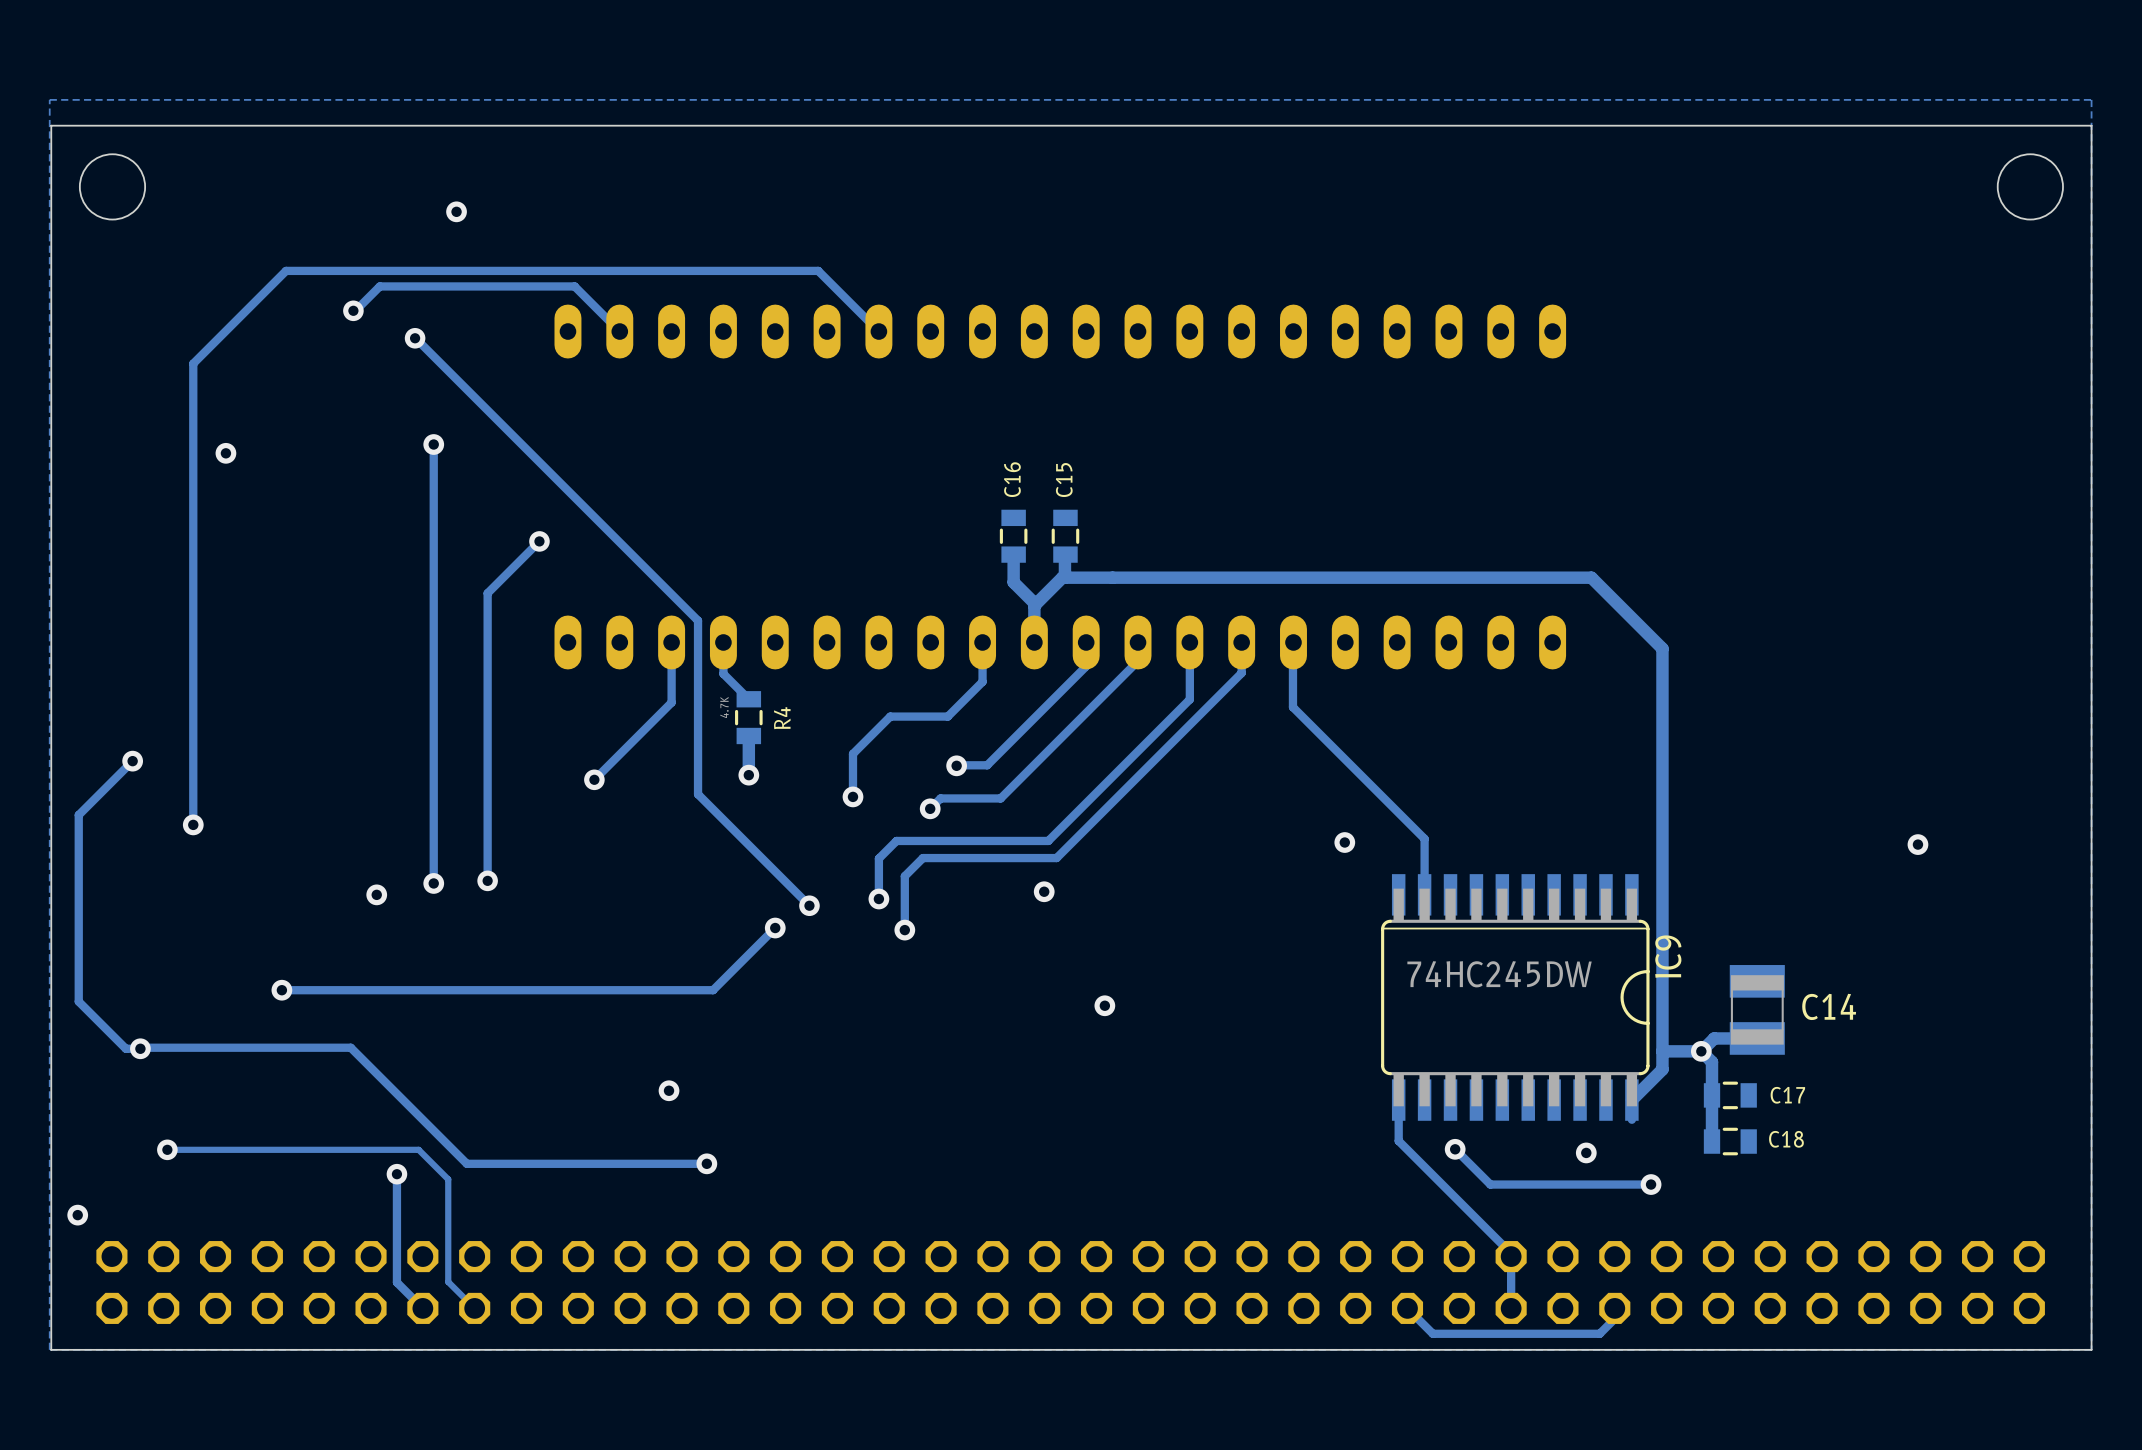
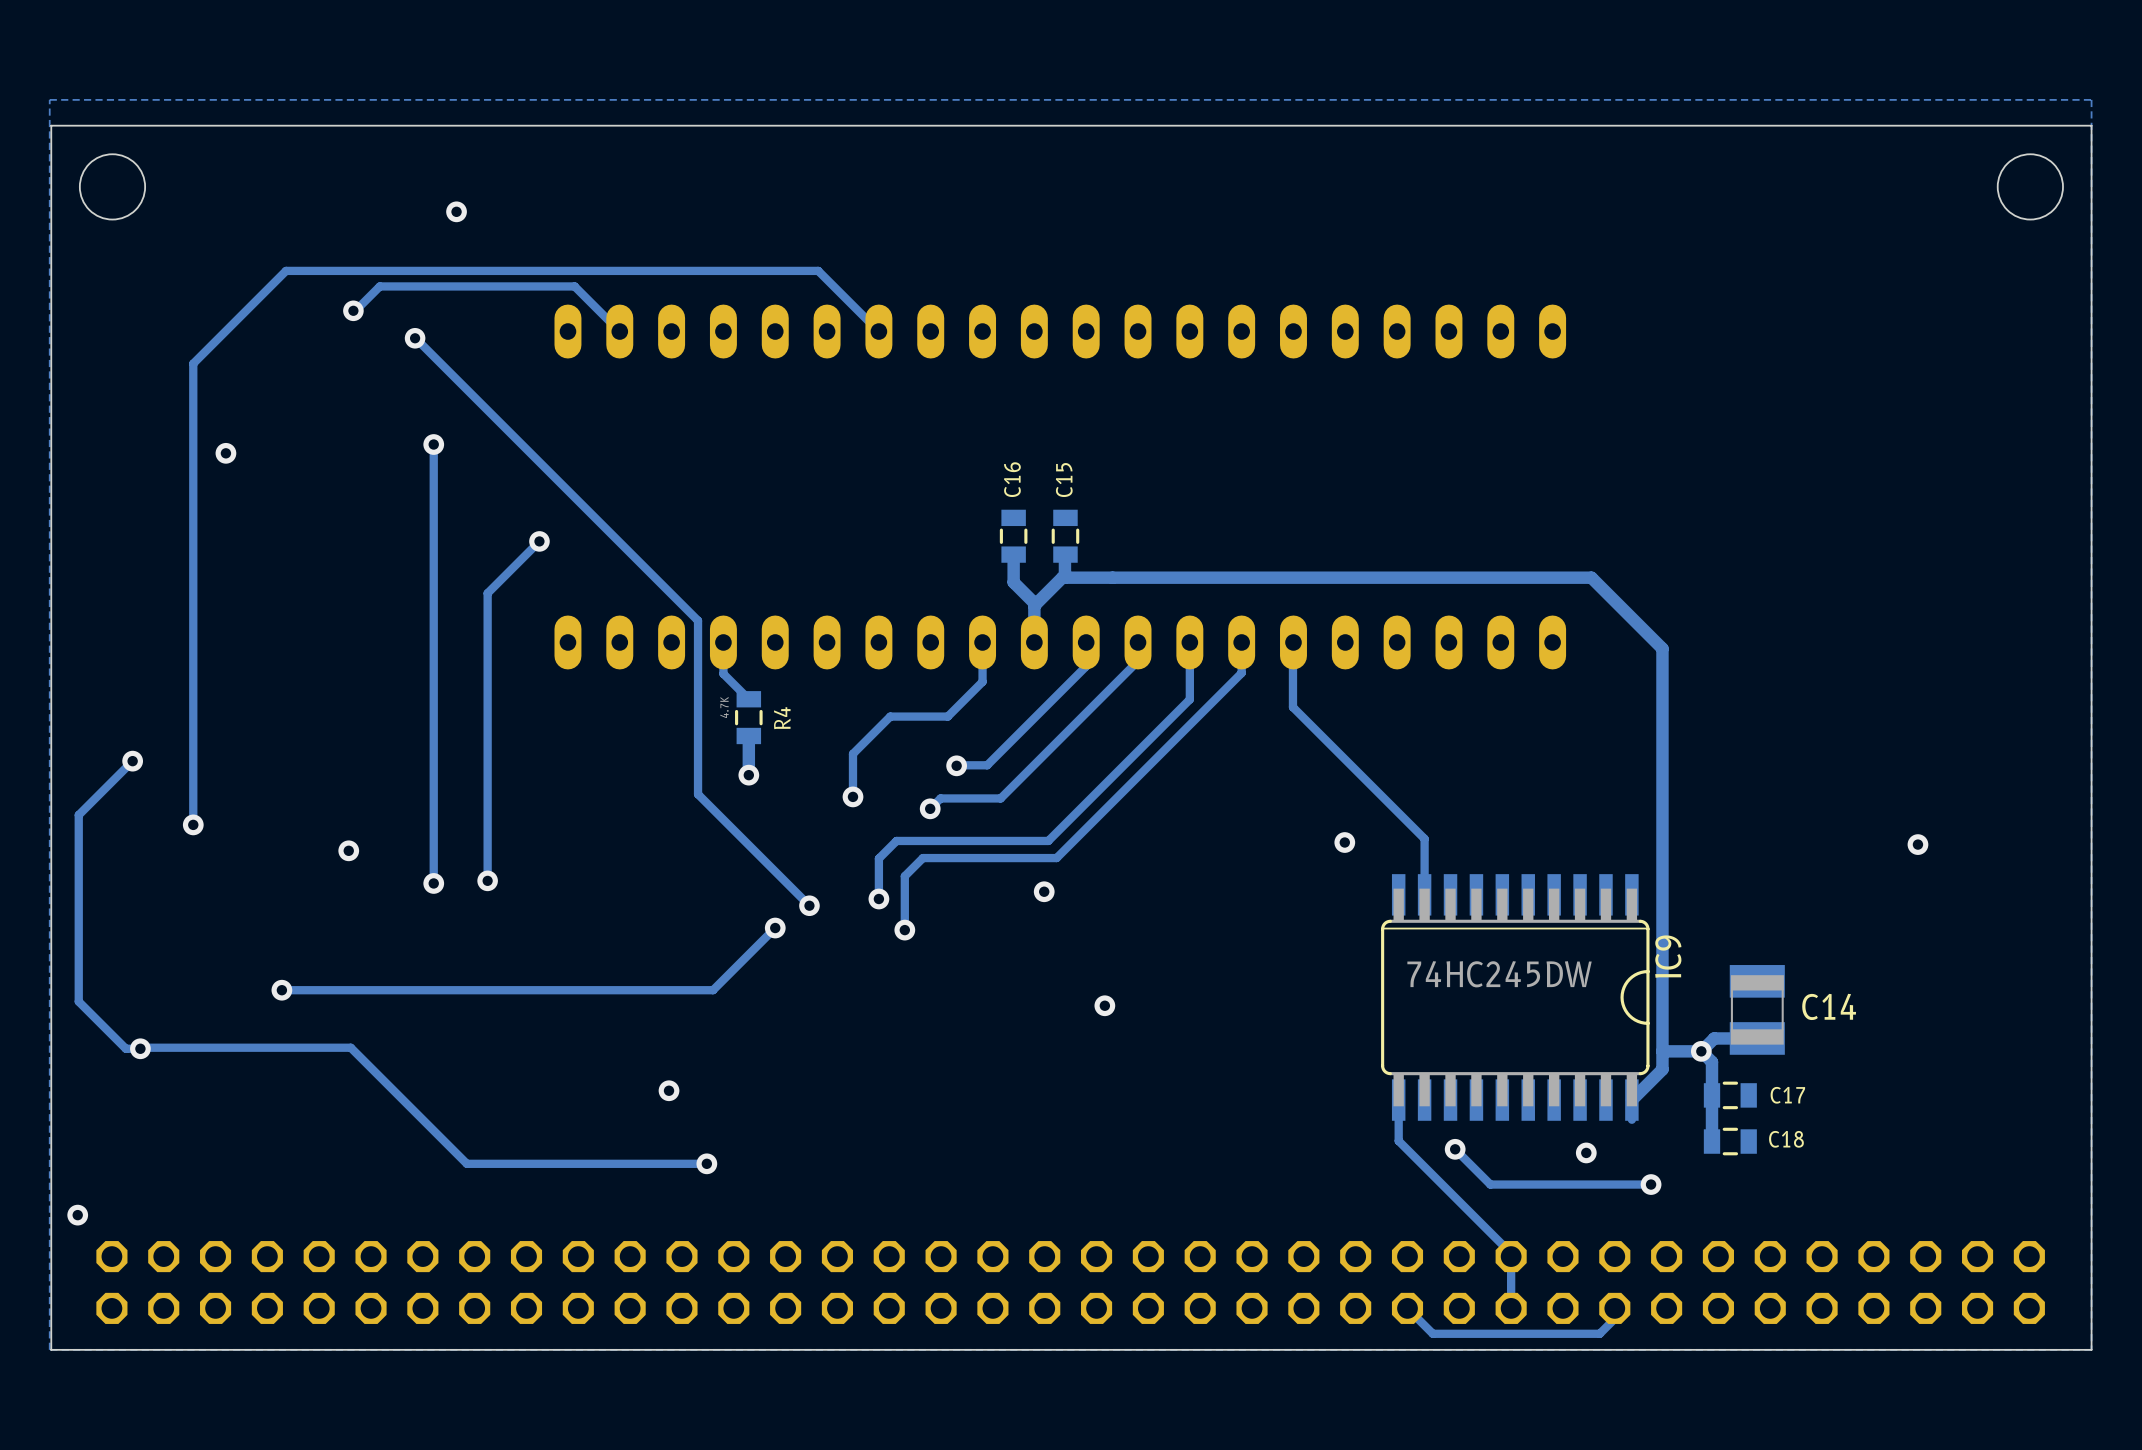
track: (671, 642) (671, 702) (594, 779) -> none
via: (594, 779) -> none
via position: (376, 894) -> (348, 850)
track: (167, 1149) (418, 1149) (448, 1179) (448, 1281) (474, 1308) -> none
via: (167, 1149) -> none
track: (396, 1174) (396, 1282) (422, 1308) -> none
via: (396, 1174) -> none

